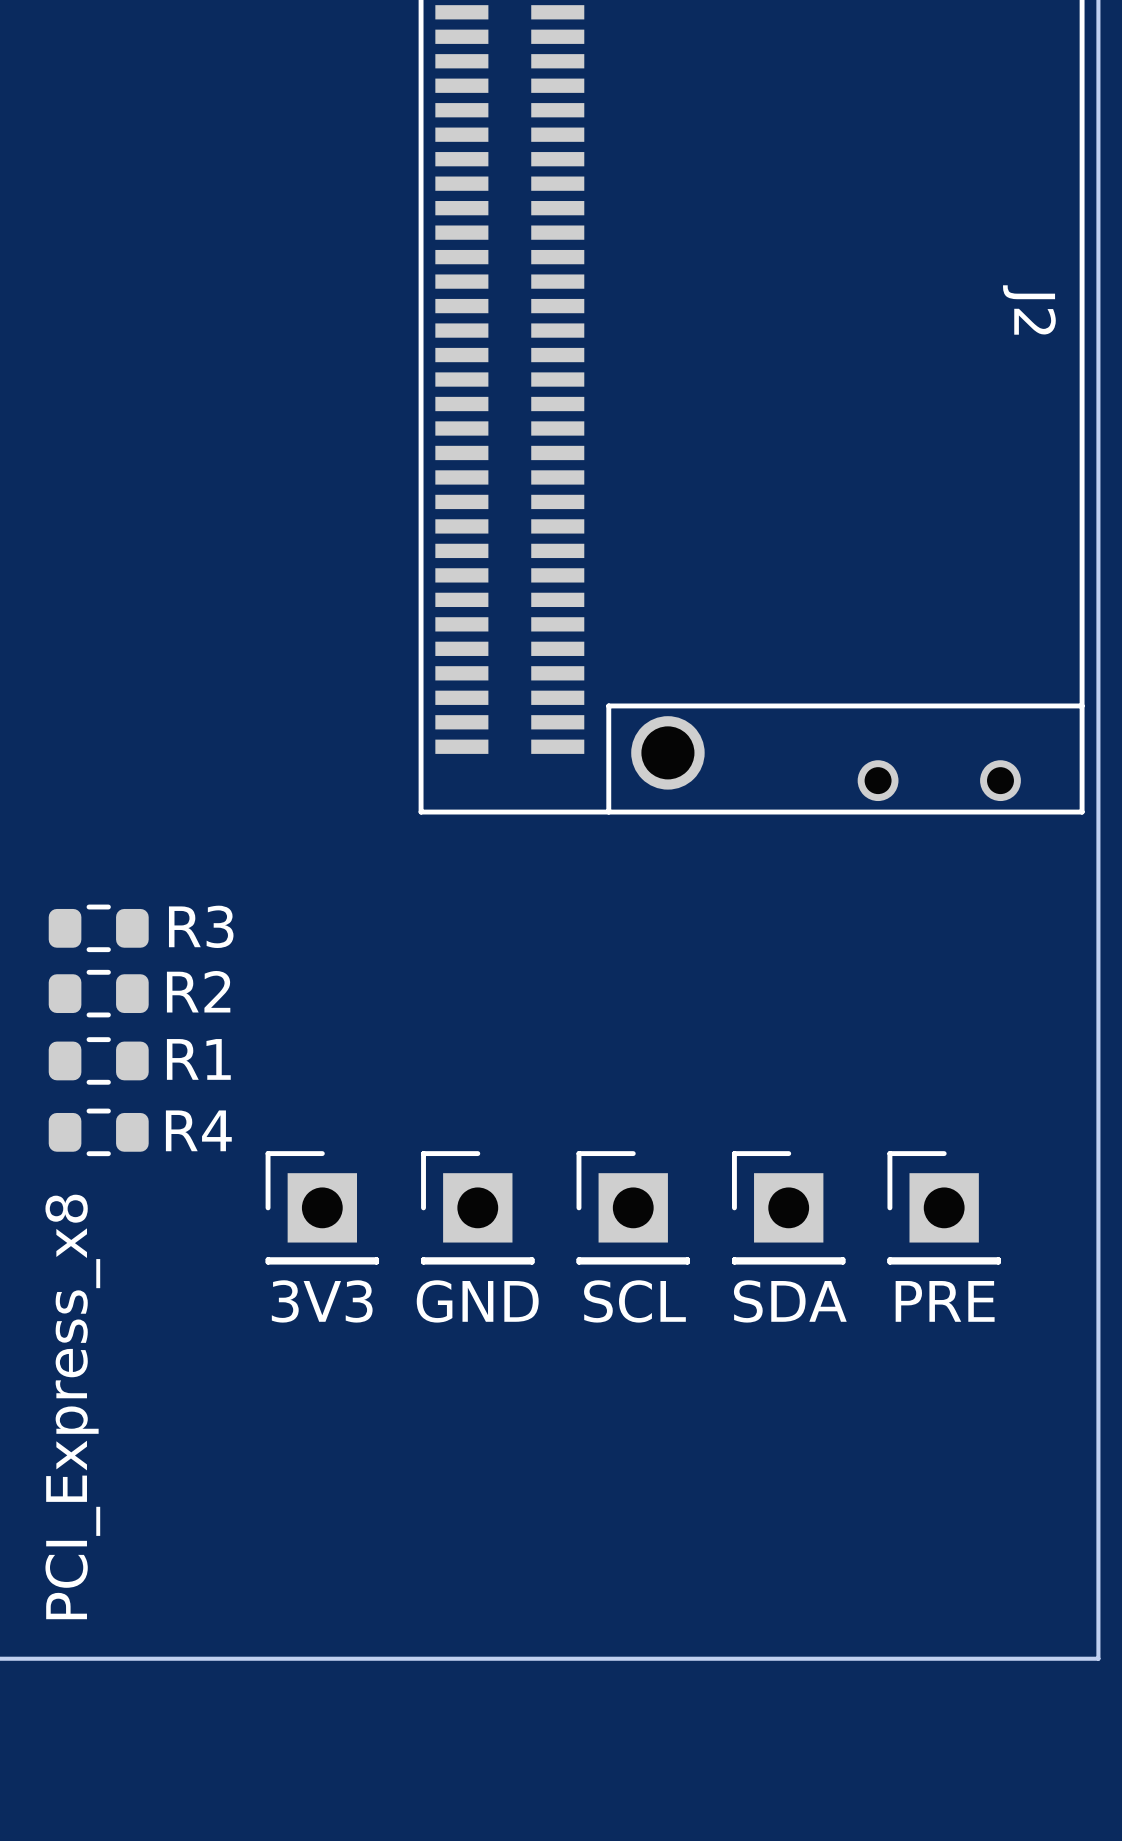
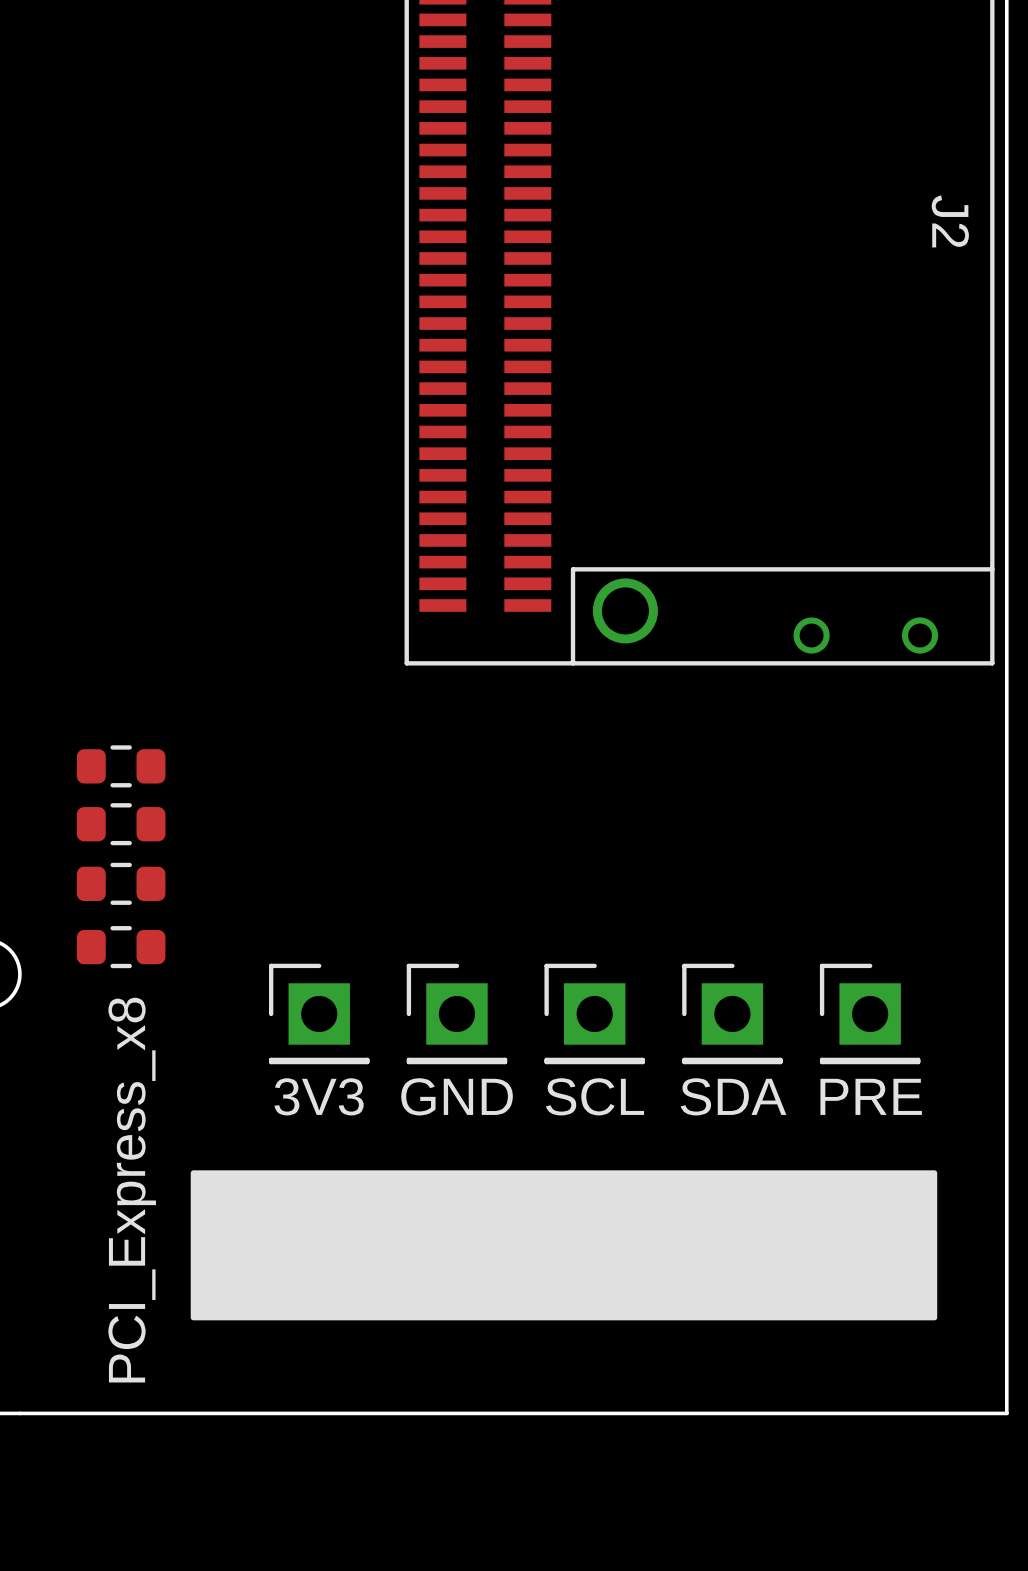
R3 name: R3 (201, 926) -> none
R2 name: R2 (198, 991) -> none
R1 name: R1 (198, 1059) -> none
R4 name: R4 (198, 1130) -> none
drawing: none -> [190, 1170, 938, 1321]
part value position: PCI_Express_x8 (72, 1406) -> PCI_Express_x8 (132, 1190)

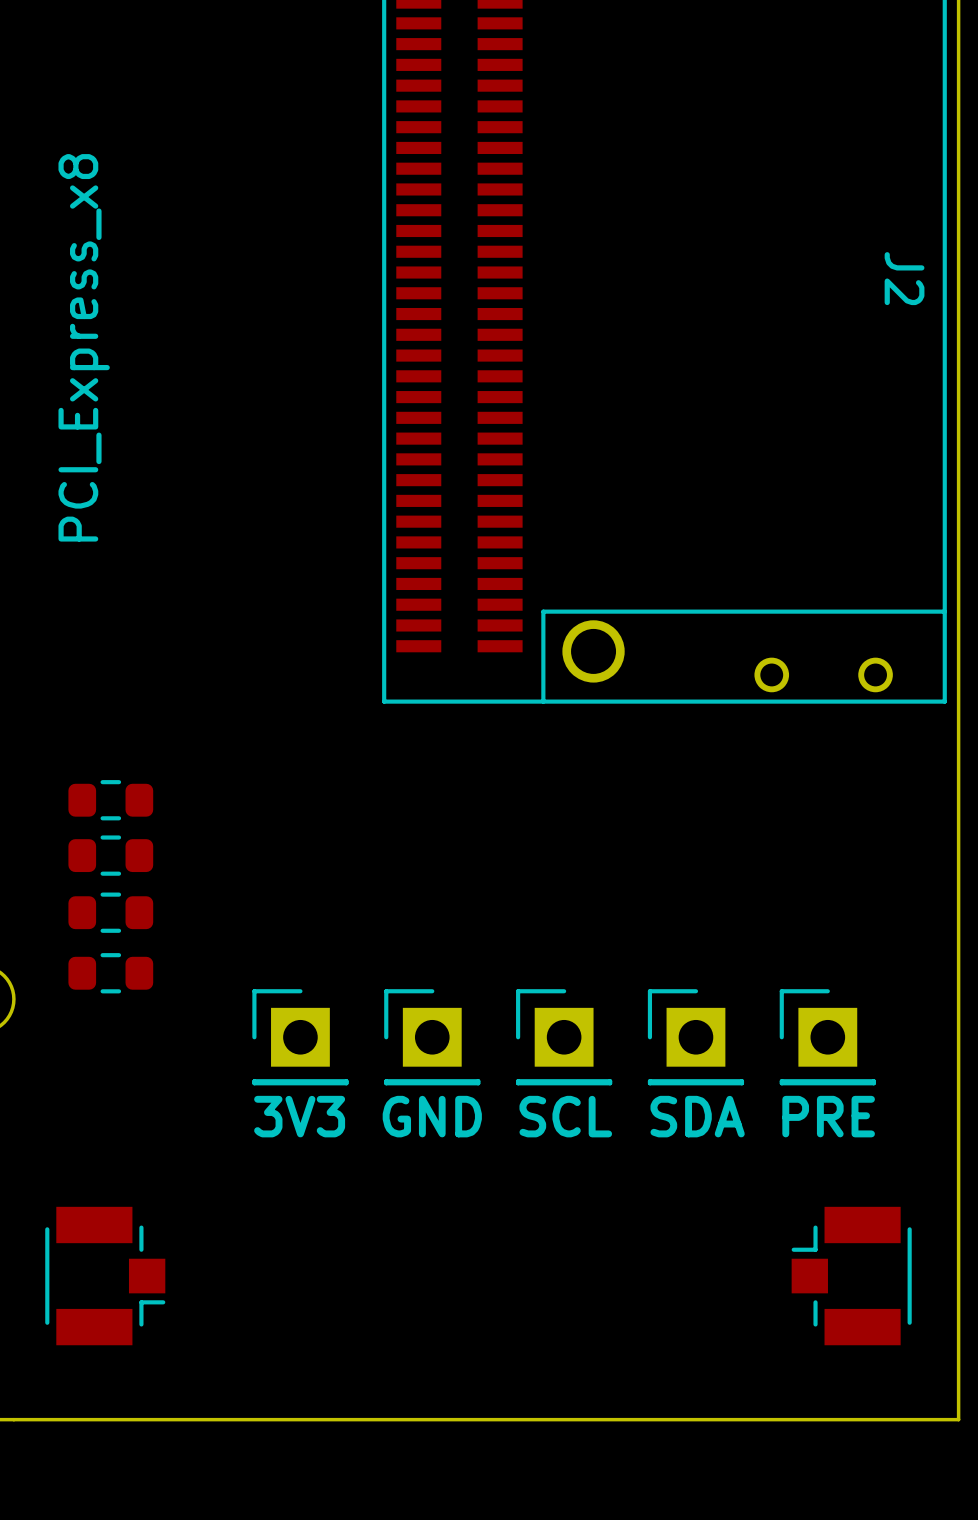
drawing: [190, 1170, 938, 1321] -> none
part value position: PCI_Express_x8 (132, 1190) -> PCI_Express_x8 (84, 347)
part: none -> (105, 1276)
part: none -> (851, 1276)

